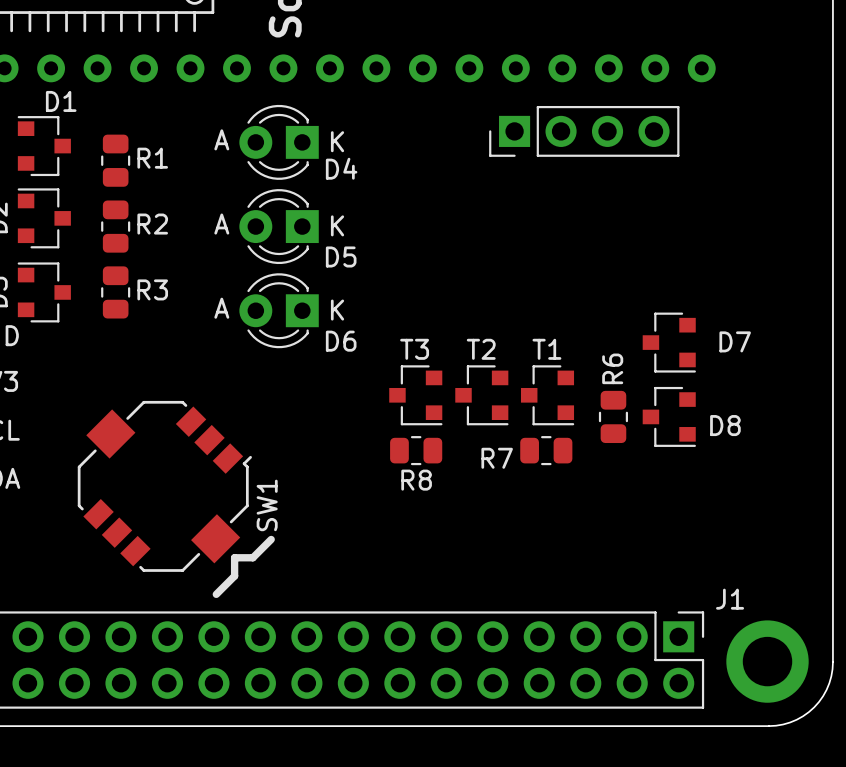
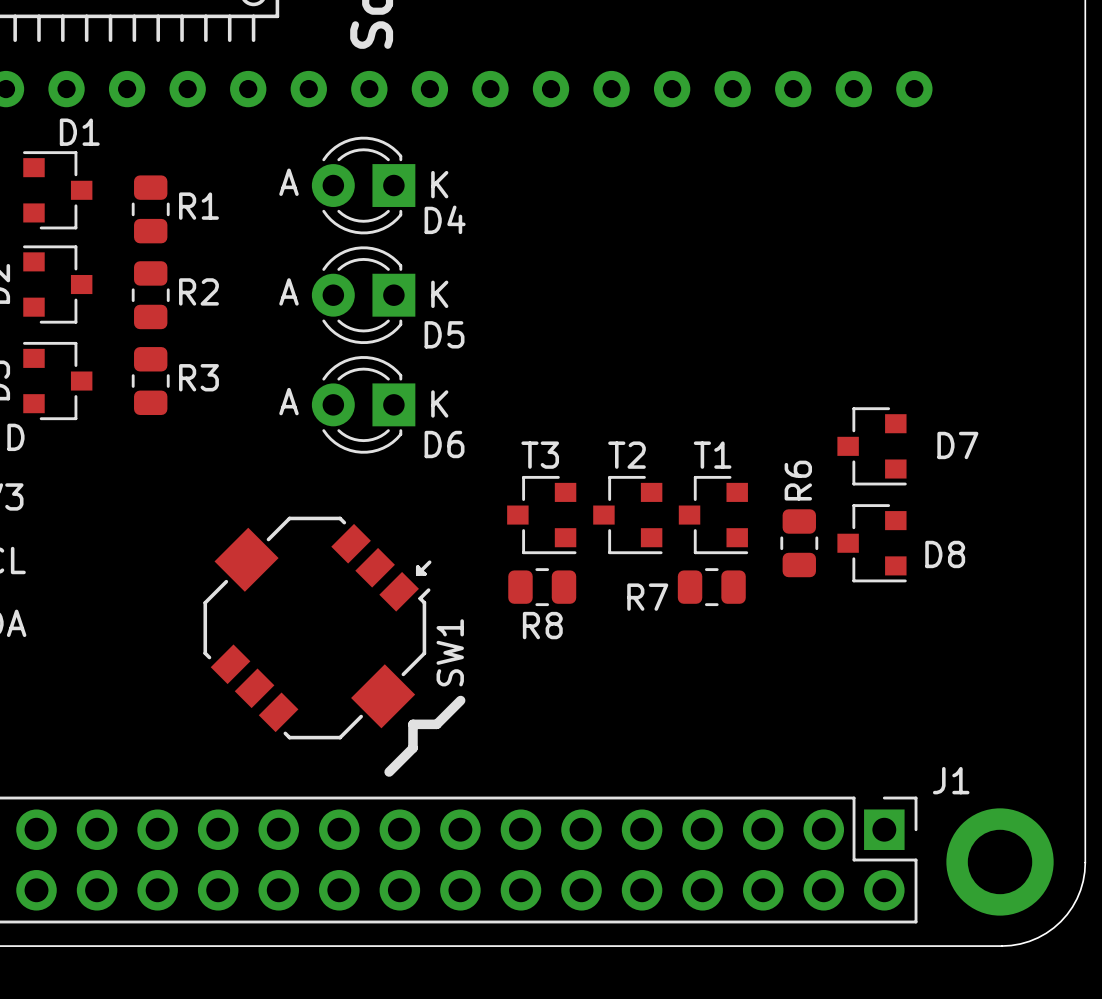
part: (584, 131) -> none
line: none -> (429, 562) (417, 574)
line: none -> (417, 574) (417, 566) (424, 574) (417, 574)
SW1 position: (164, 486) -> (316, 628)
line: (271, 539) (252, 557) (234, 557) (234, 576) (216, 594) -> (460, 700) (436, 724) (412, 724) (412, 748) (389, 772)

